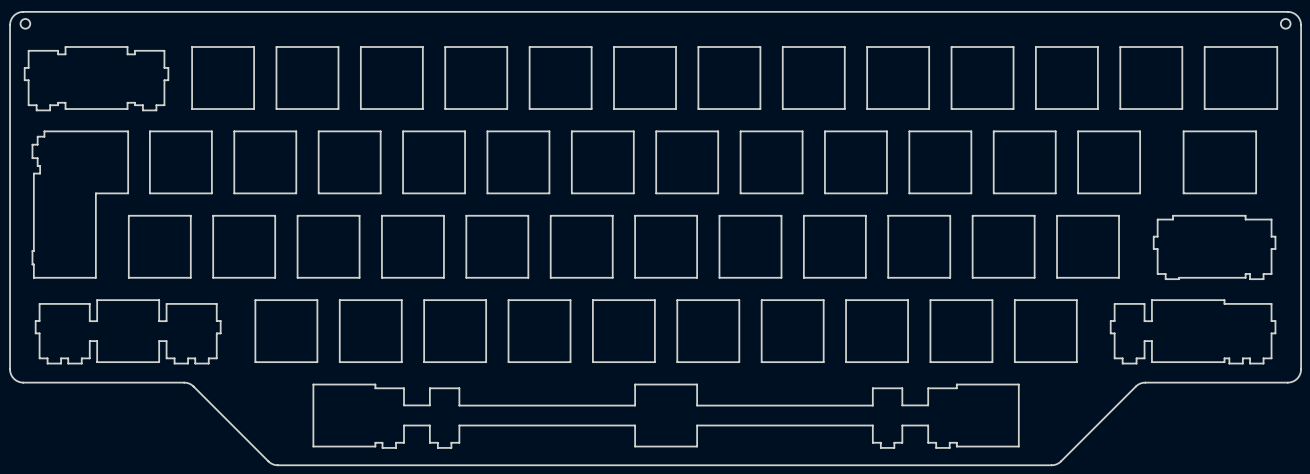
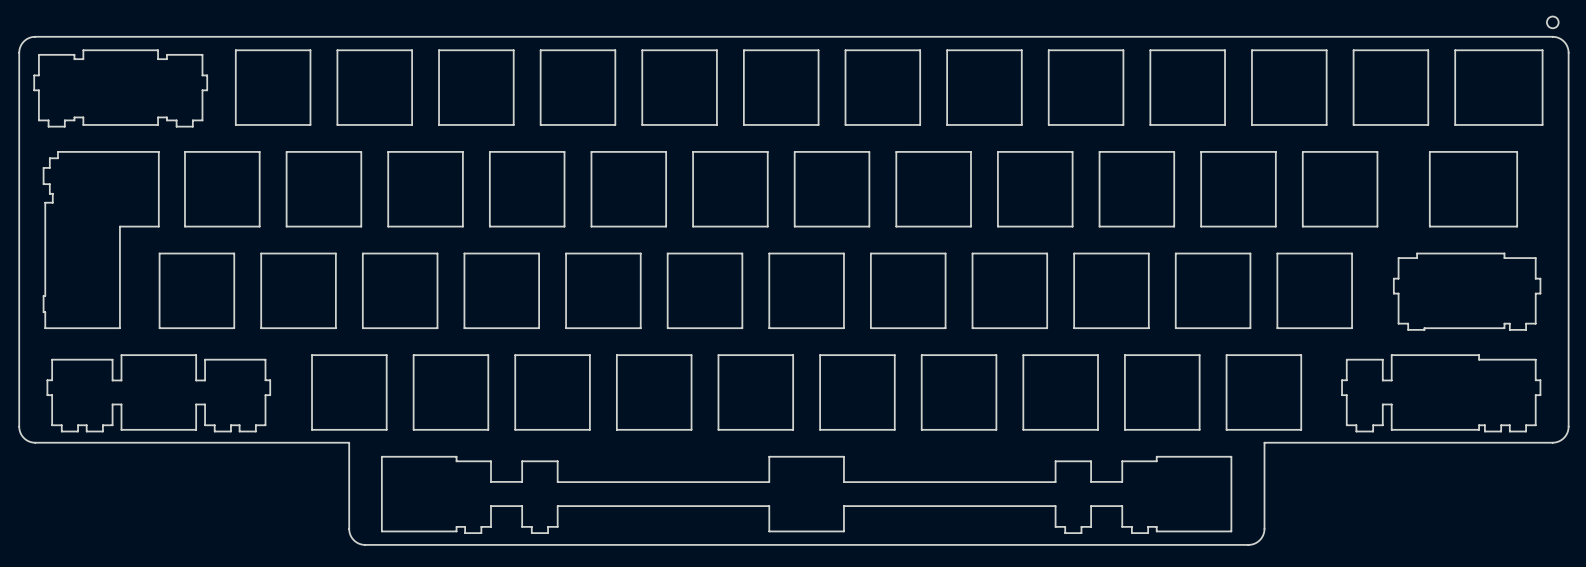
board edge: (1287, 11) (19, 12) (12, 17) (10, 25) (10, 372) (15, 379) (23, 382) (189, 383) (268, 461) (276, 465) (1055, 464) (1140, 383) (1287, 382) (1294, 380) (1299, 375) (1301, 369) (1301, 25) (1297, 15) (1287, 11) -> (1552, 36) (1563, 41) (1568, 52) (1568, 426) (1566, 434) (1560, 440) (1552, 442) (1264, 442) (1264, 531) (1259, 540) (1252, 544) (363, 544) (353, 540) (349, 531) (349, 442) (35, 442) (25, 439) (19, 430) (19, 52) (22, 43) (31, 37) (1552, 36)
part: (25, 23) -> none

